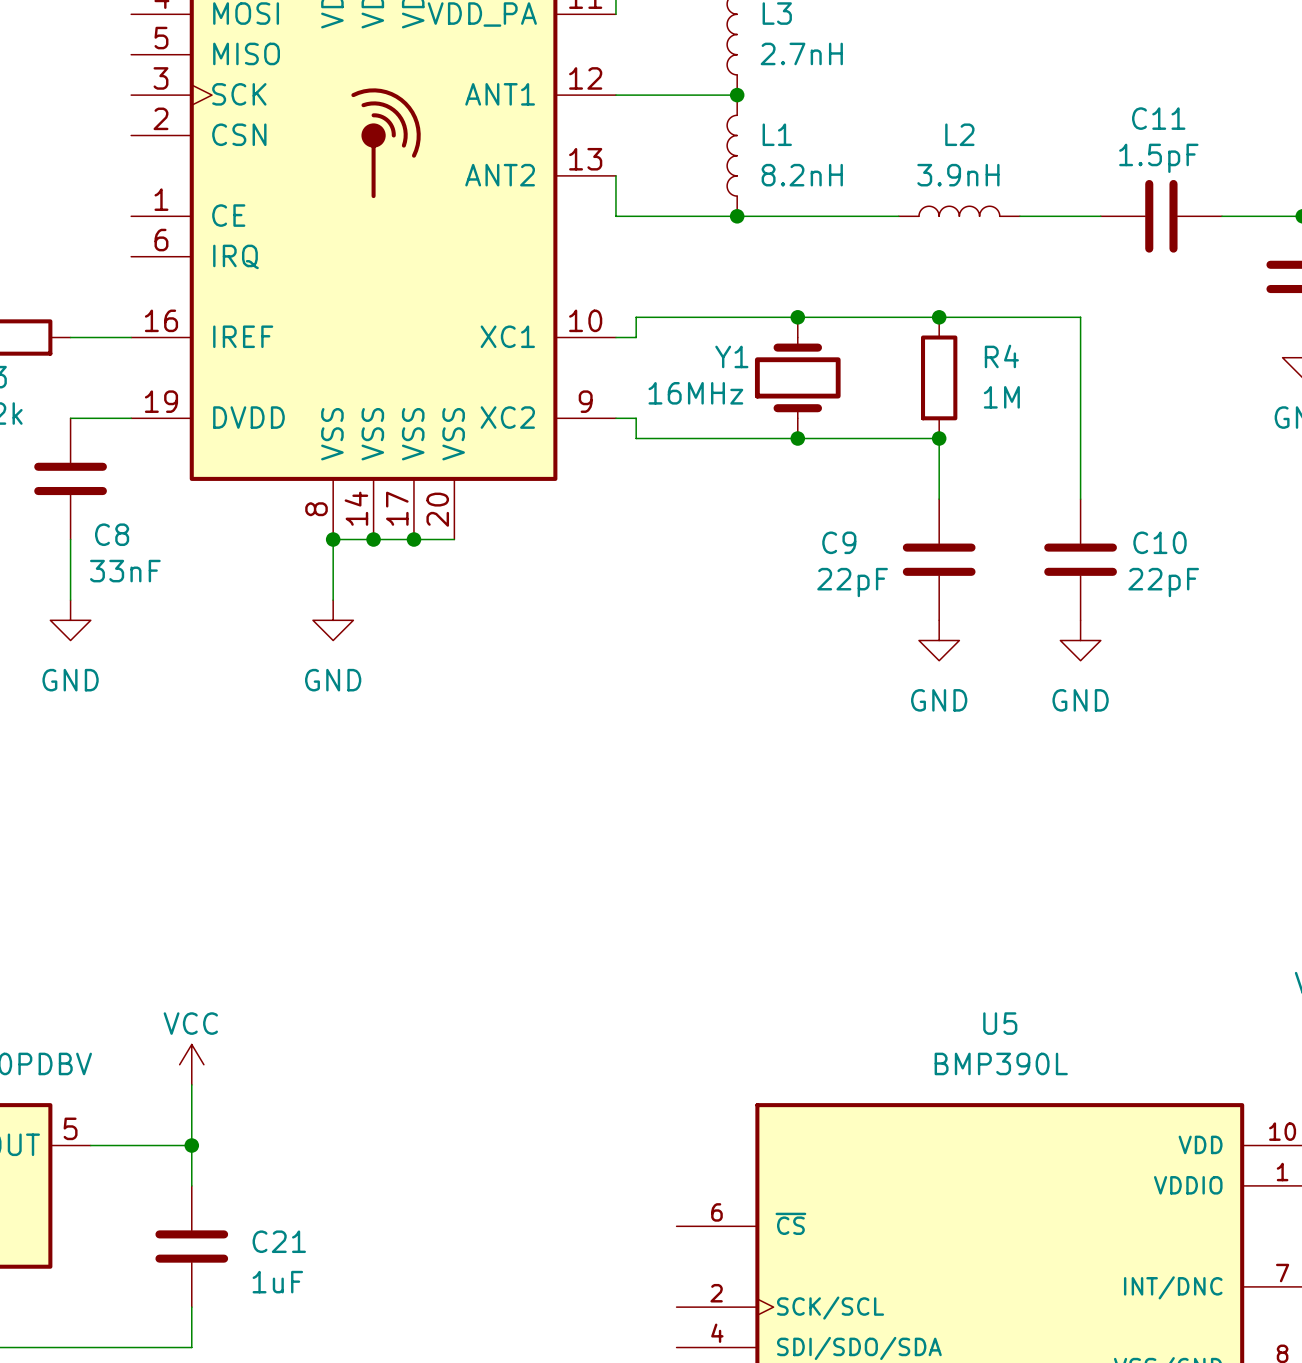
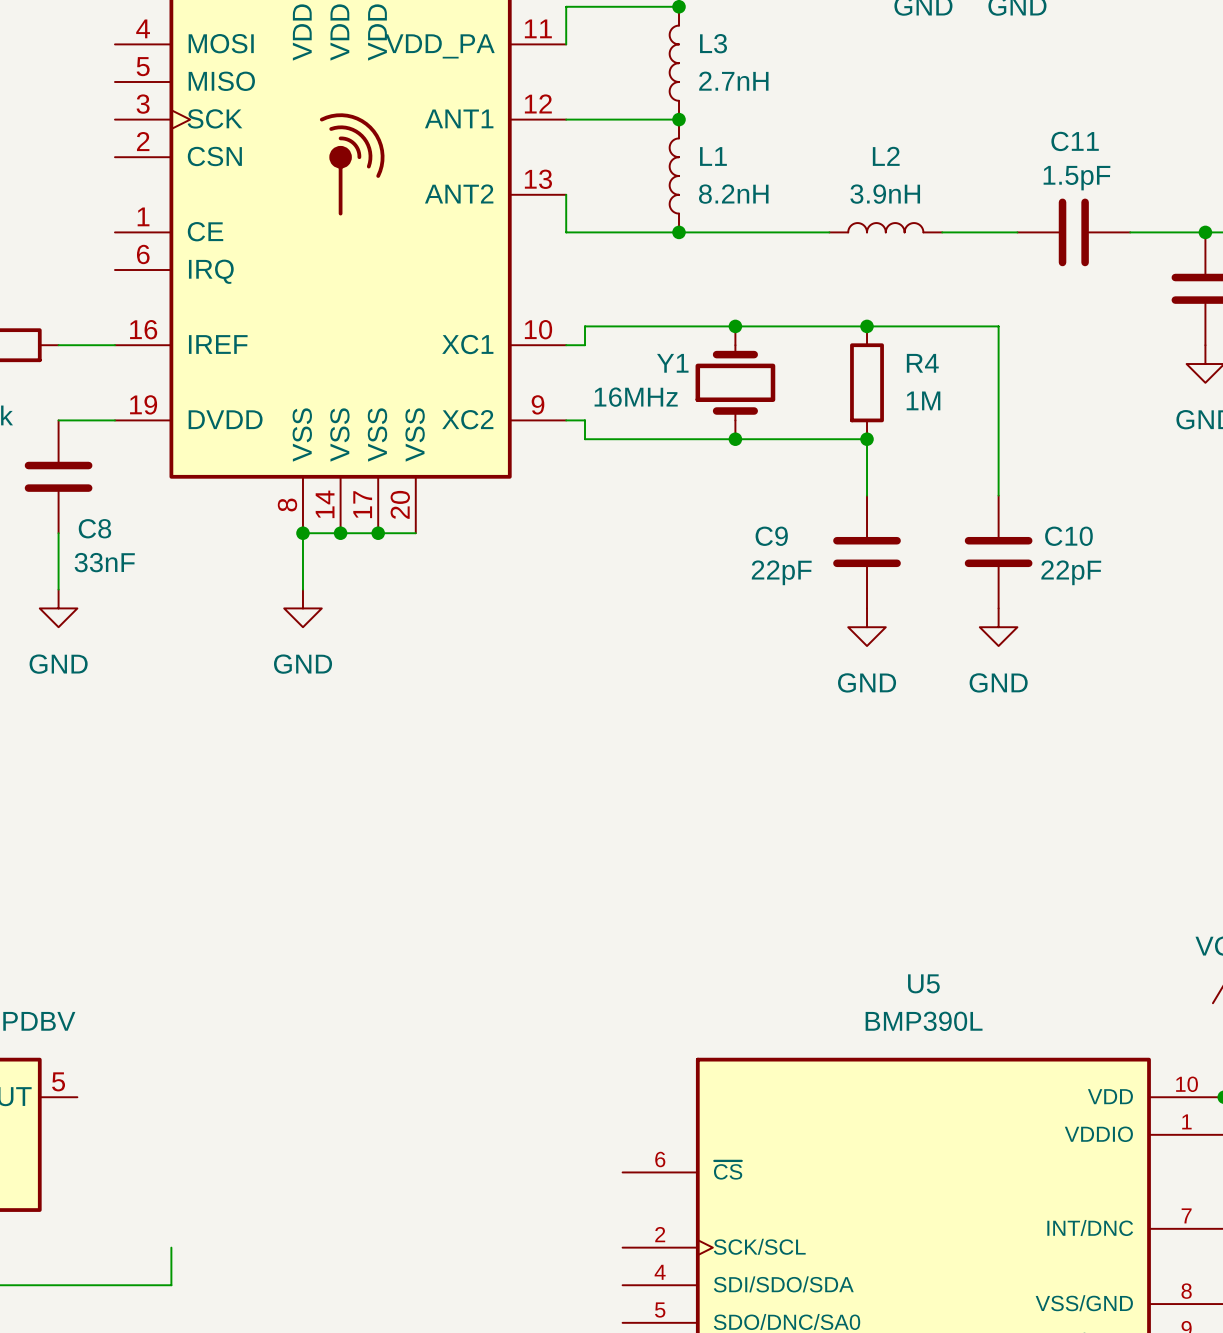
power symbol: VCC (191, 1064) -> none
wire: (191, 1084) (191, 1185) -> none
wire: (90, 1145) (191, 1145) -> none
junction: (191, 1145) -> none
C21: 1uF (191, 1246) -> none

